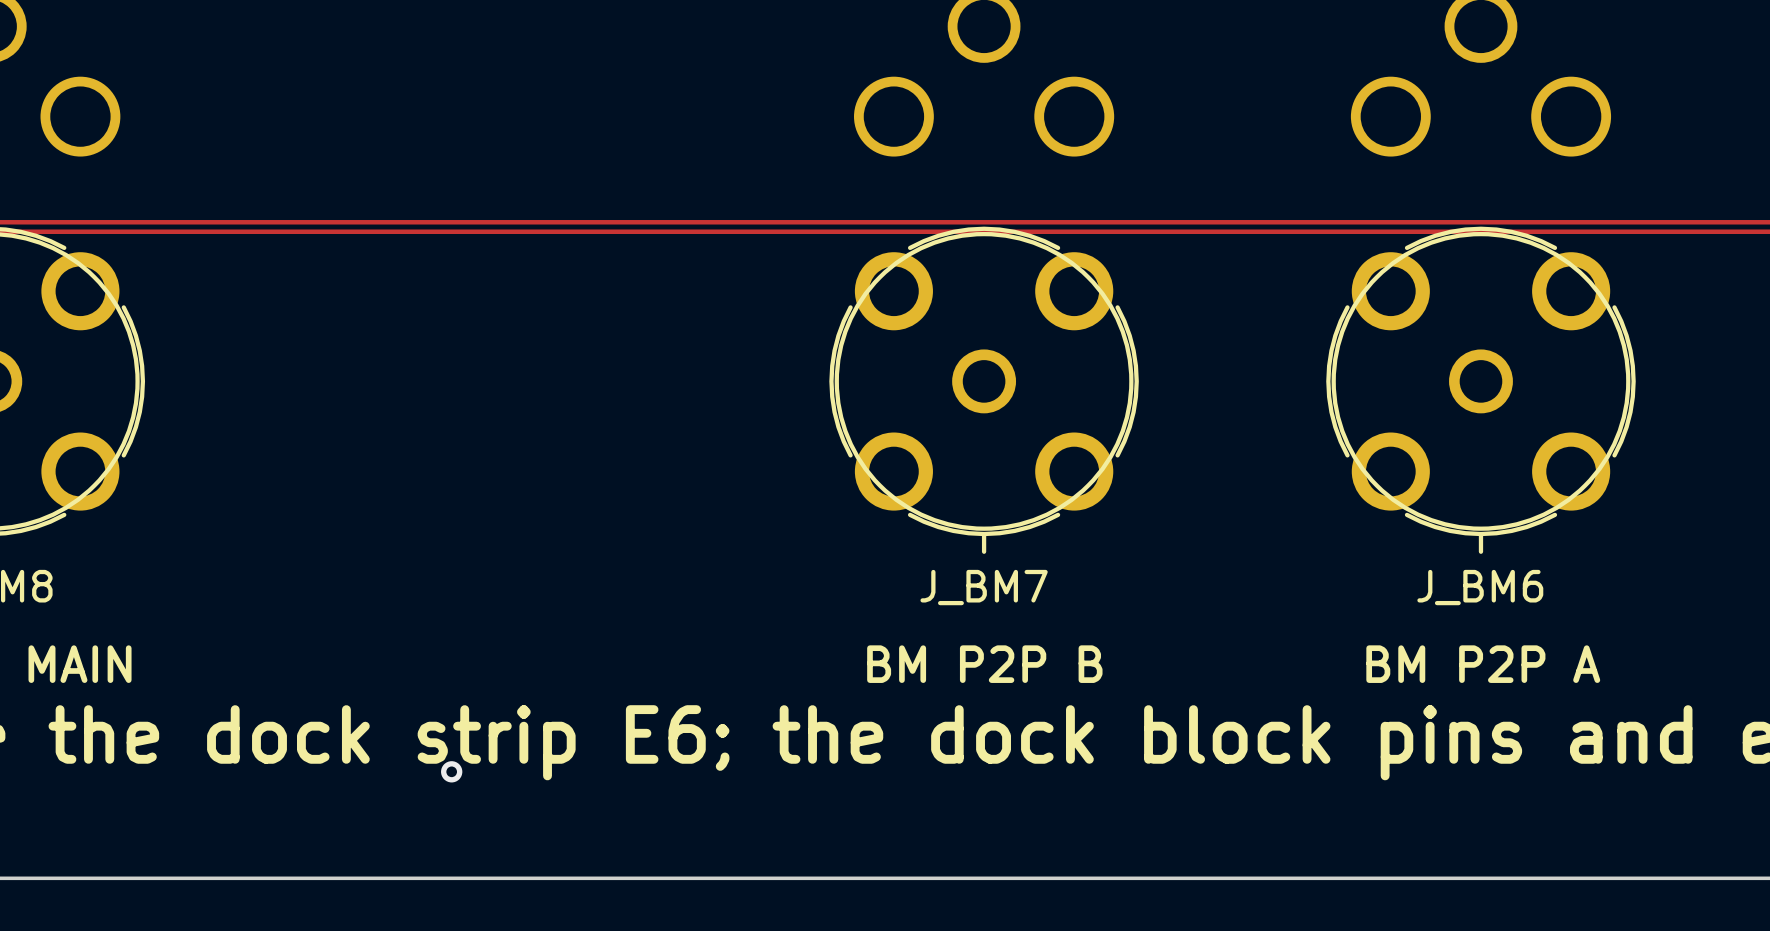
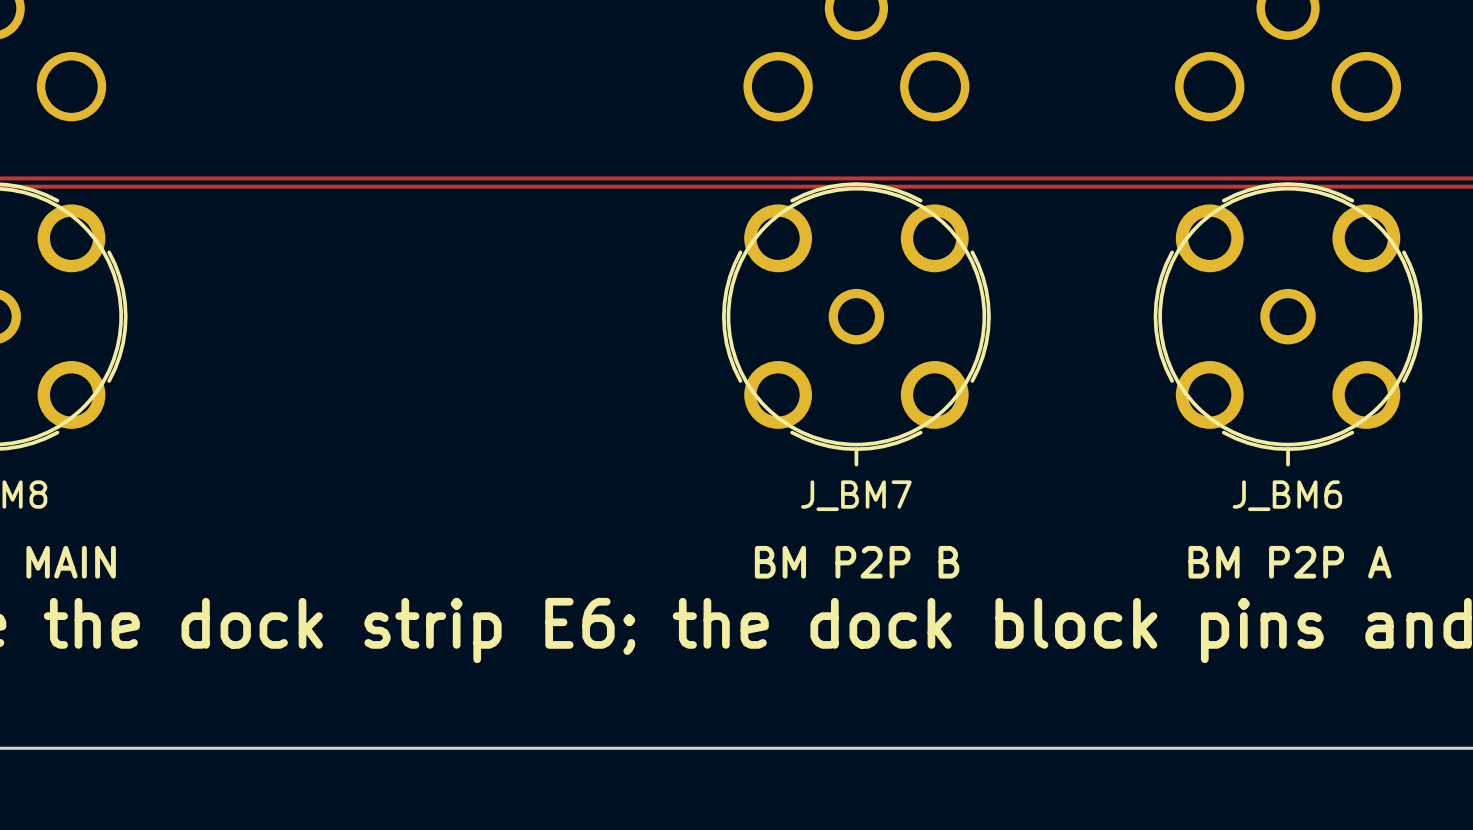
via: (451, 771) -> none

